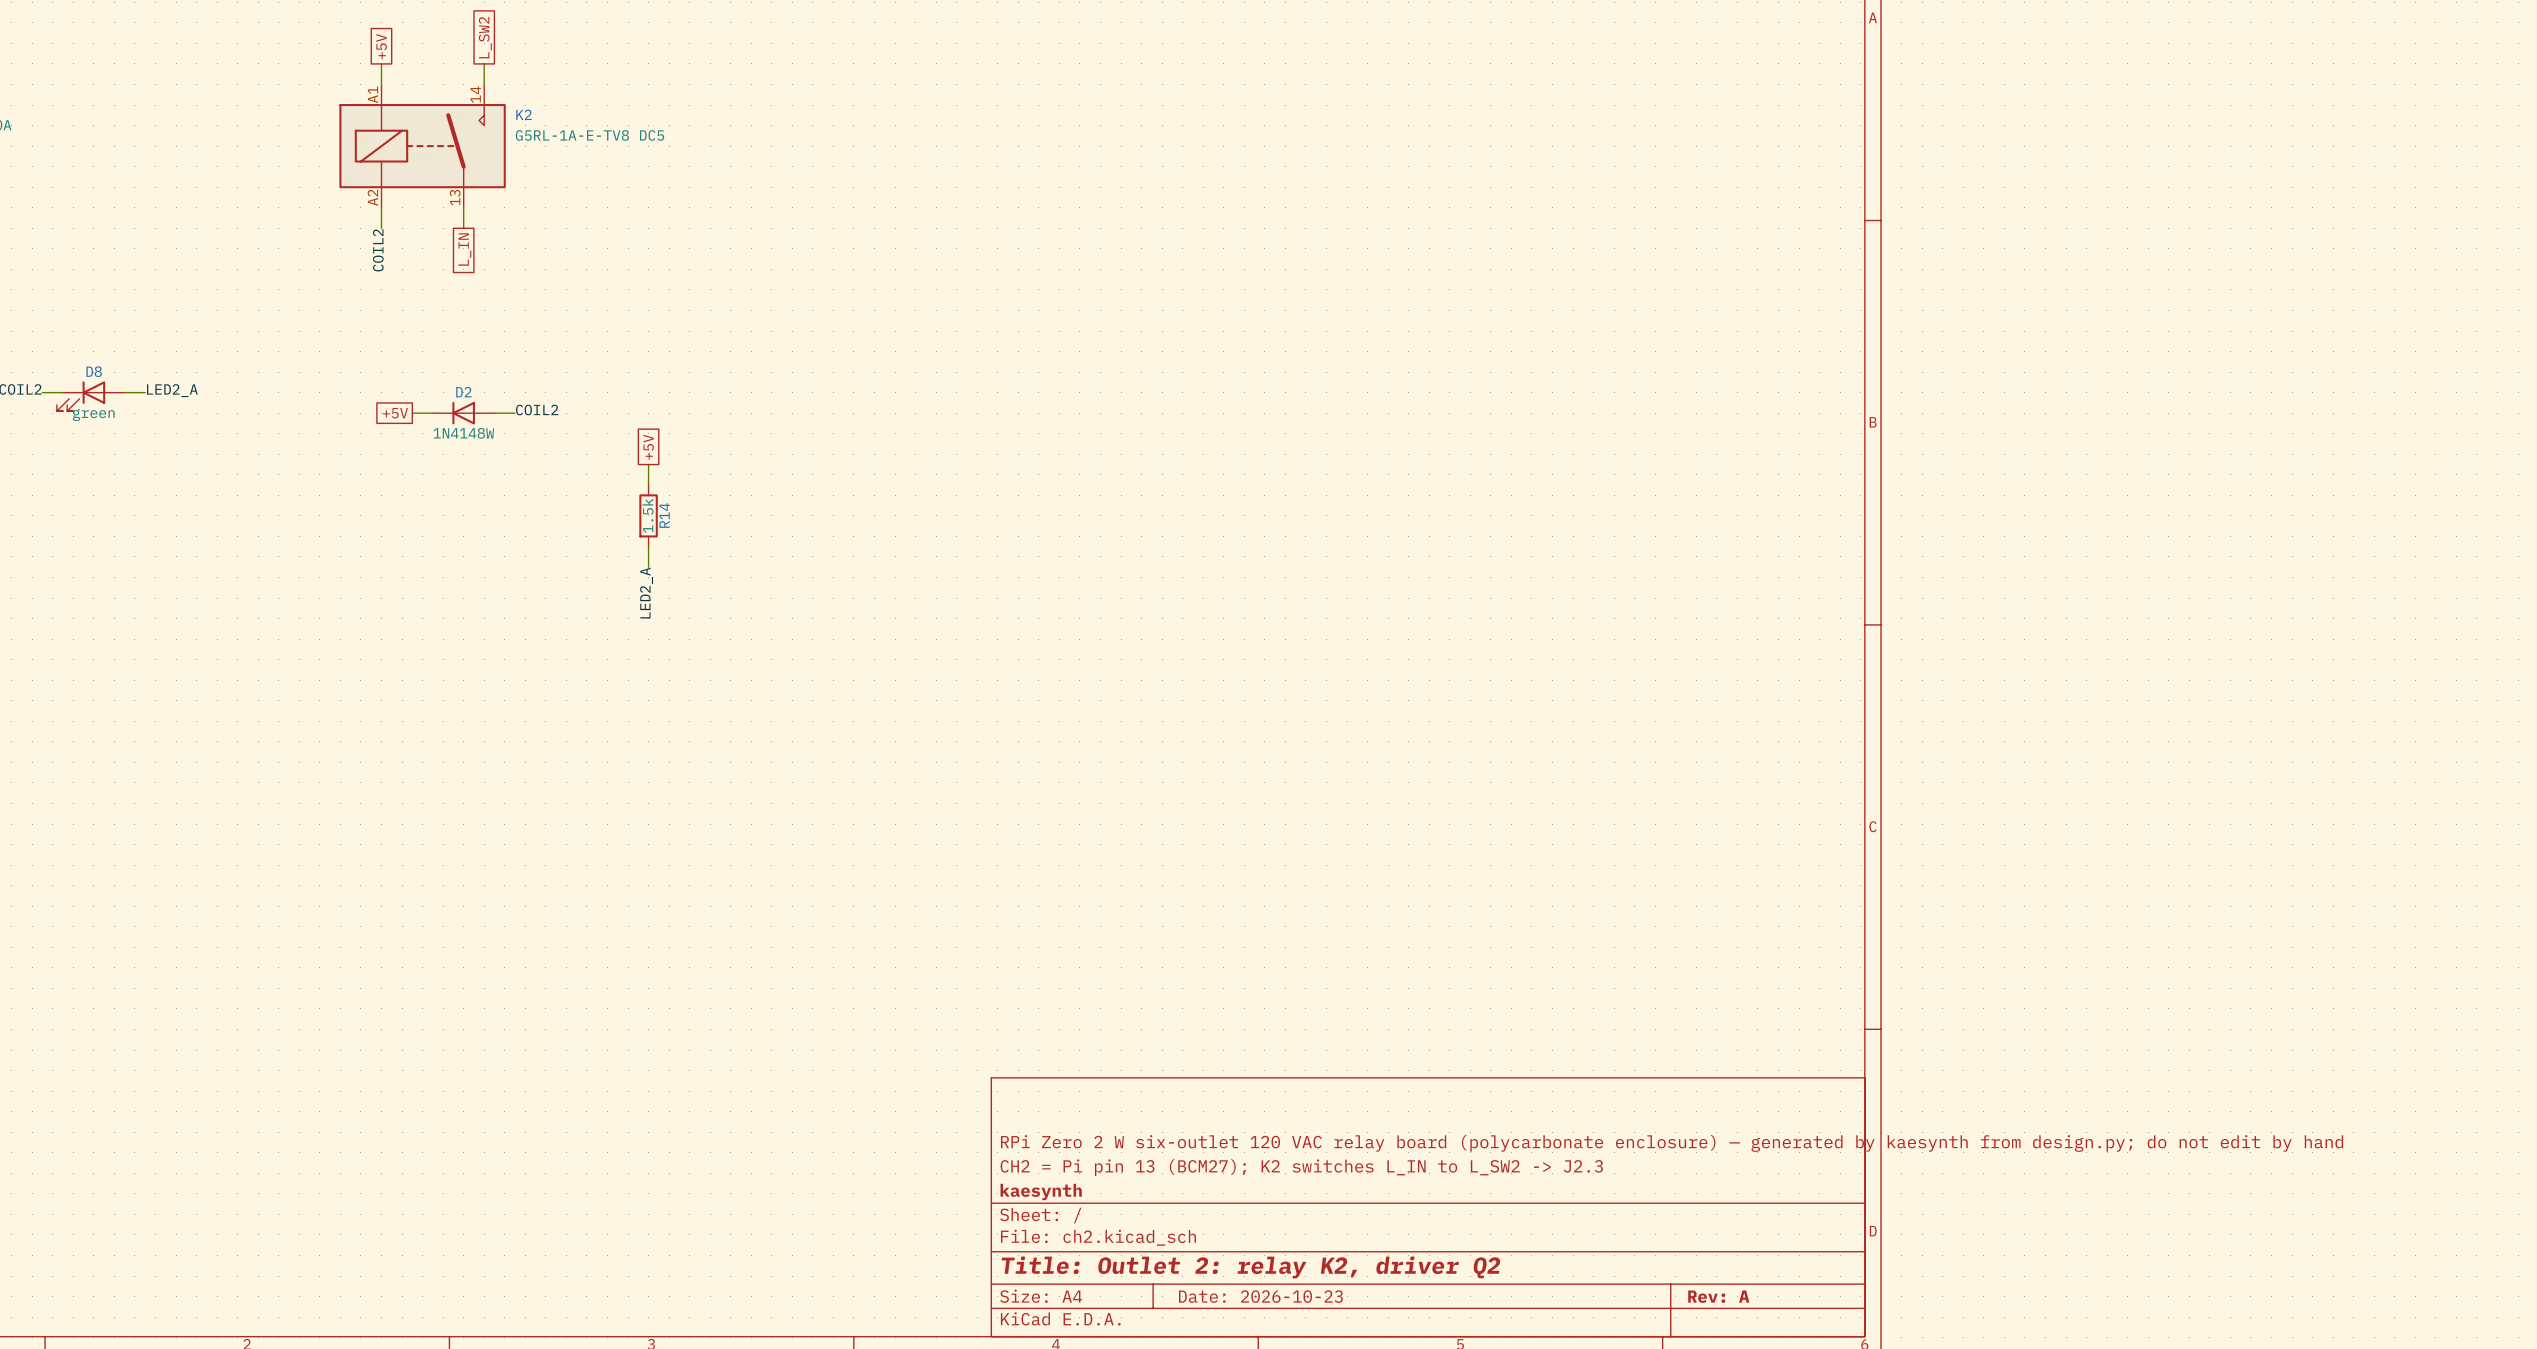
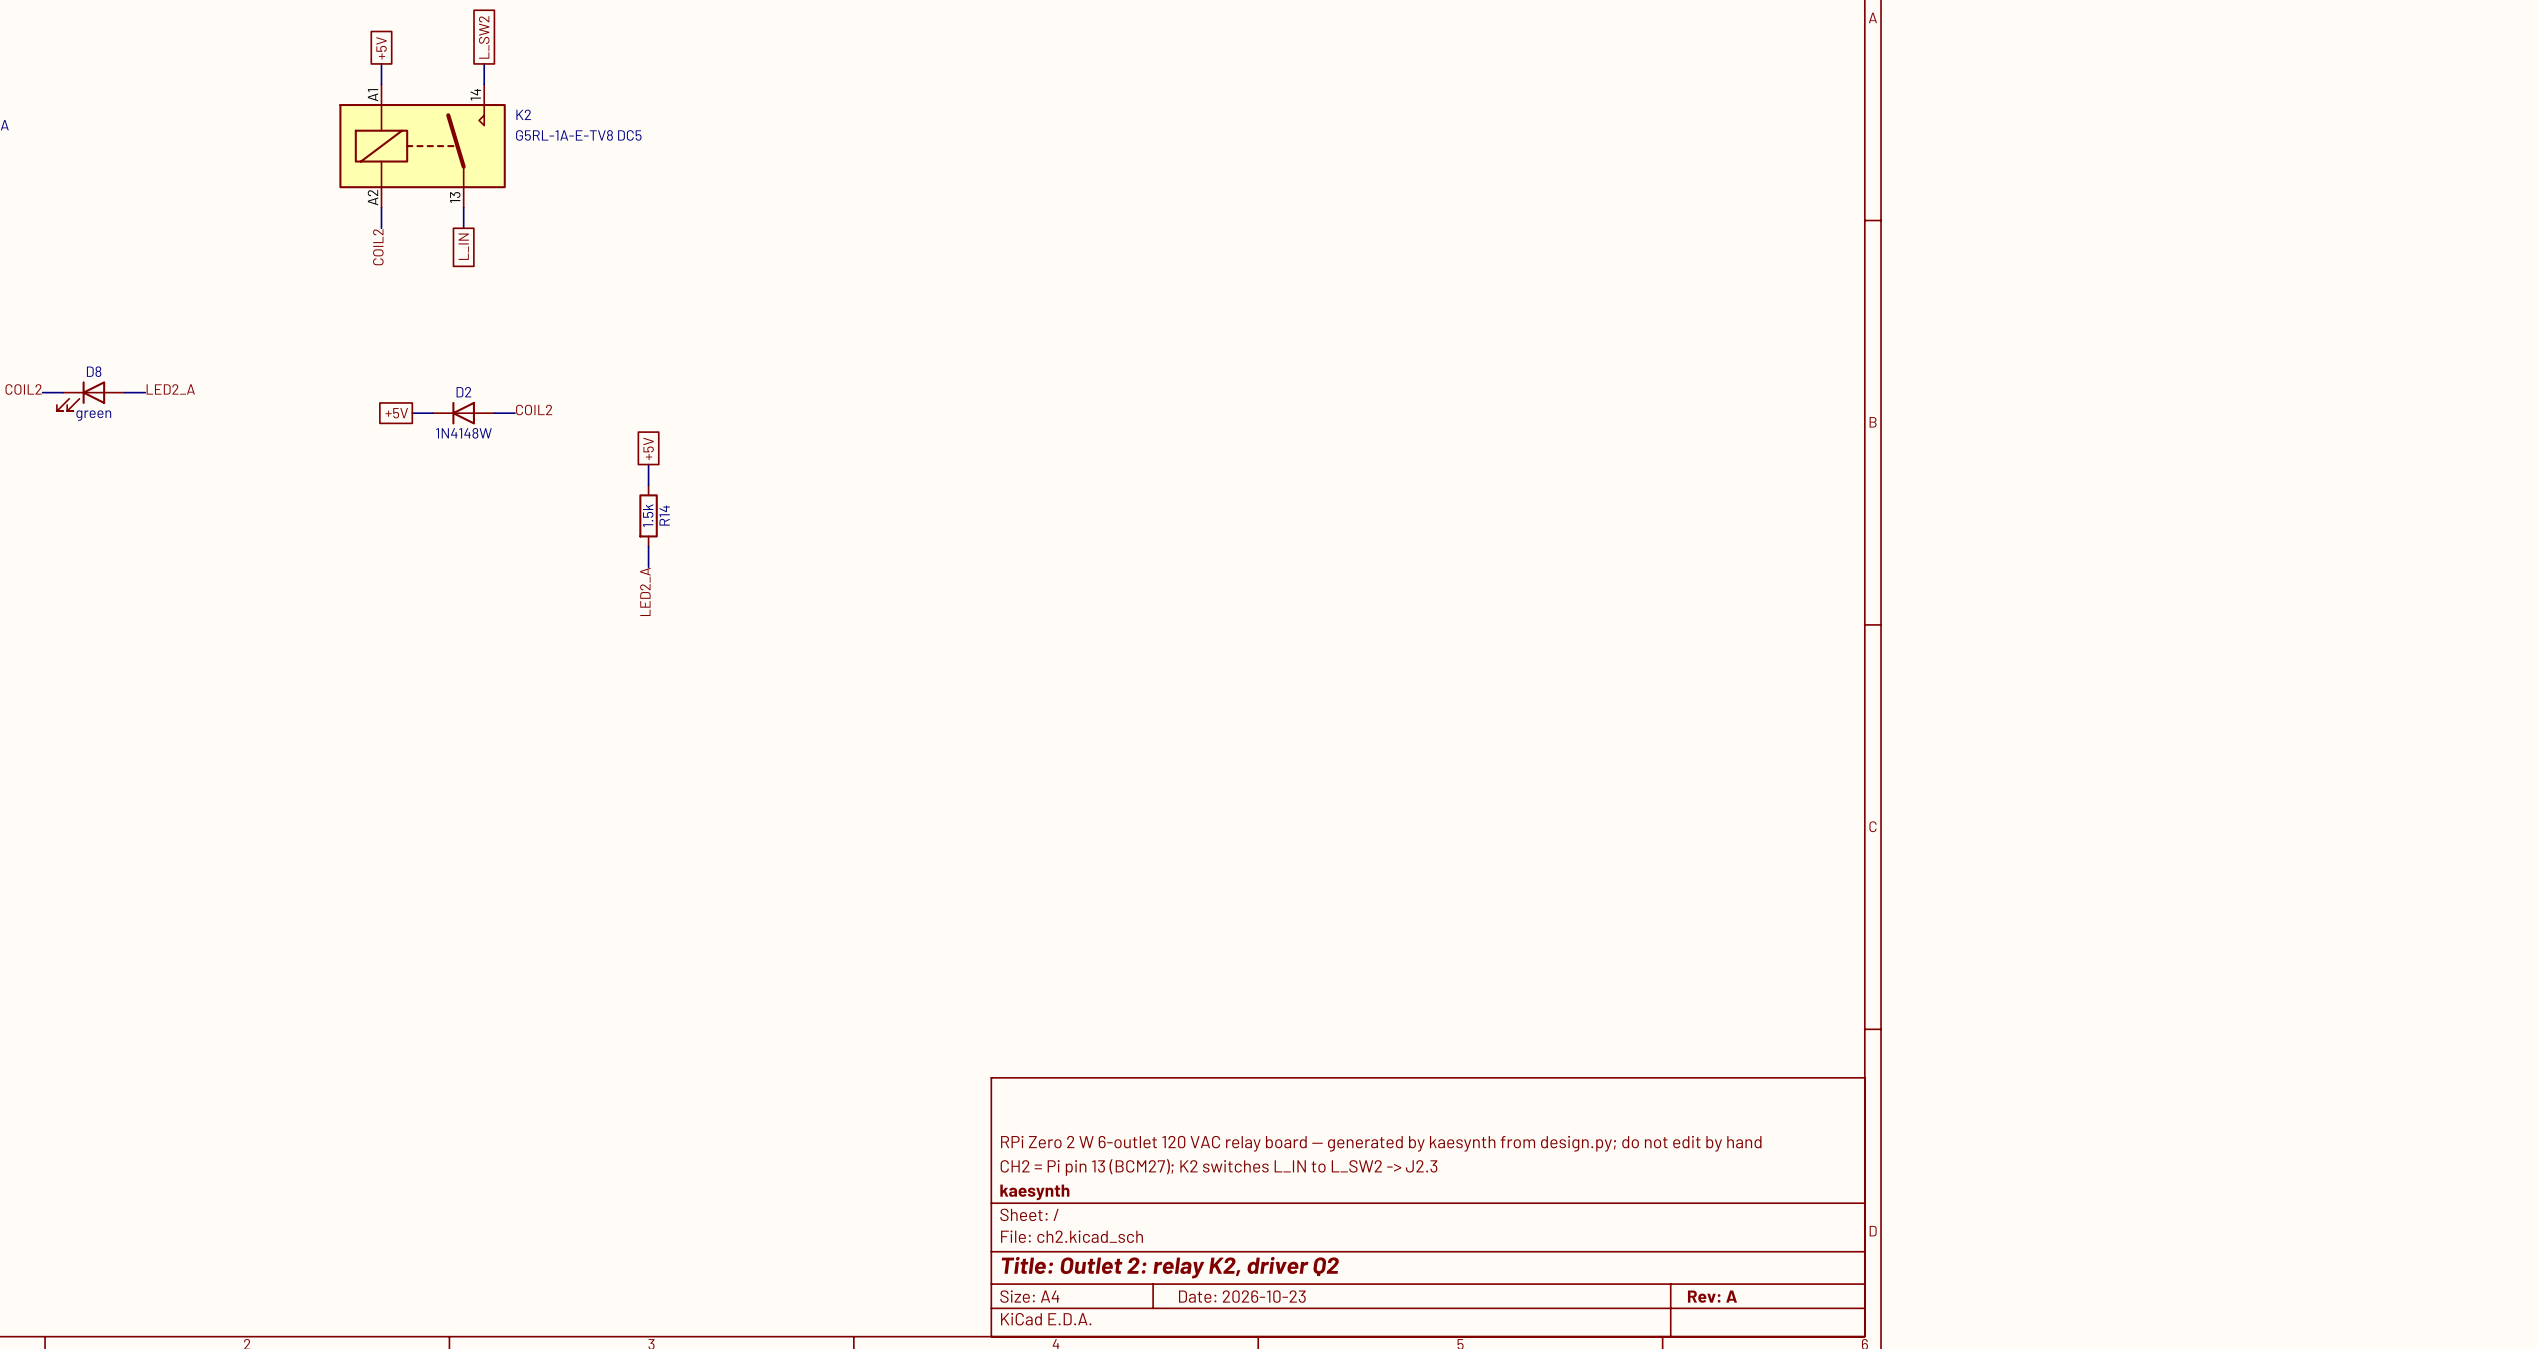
title block: RPi Zero 2 W six-outlet 120 VAC relay board (polycarbonate enclosure) — generated by kaesynth from design.py; do not edit by hand (1672, 1143) -> RPi Zero 2 W 6-outlet 120 VAC relay board — generated by kaesynth from design.py; do not edit by hand (1381, 1143)

